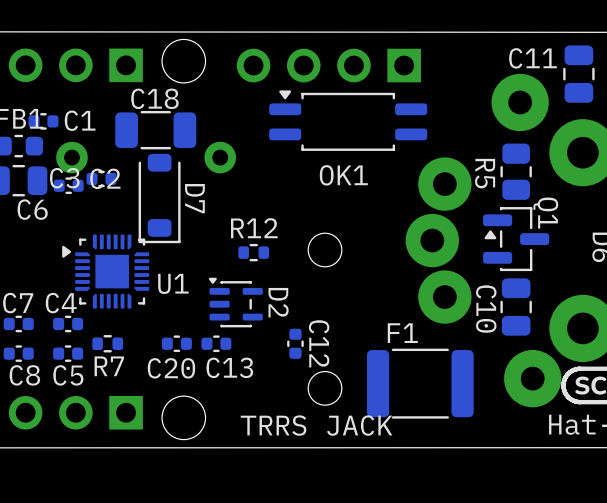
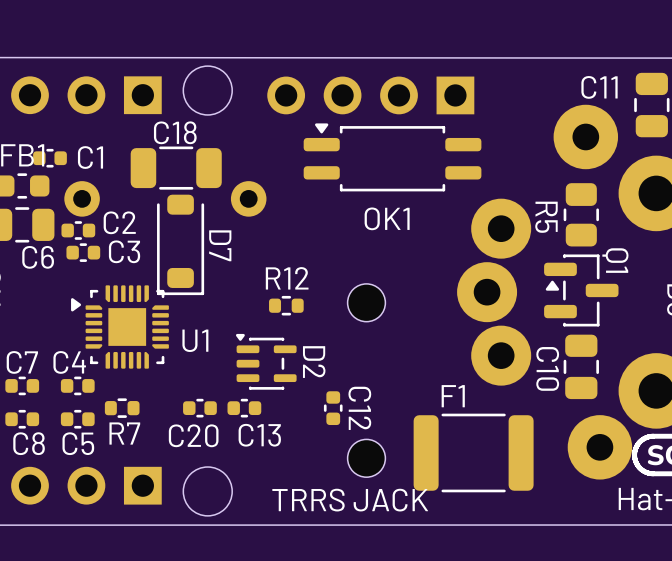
C3 name position: C3 (64, 178) -> C3 (124, 251)
C3 position: (101, 178) -> (83, 252)

